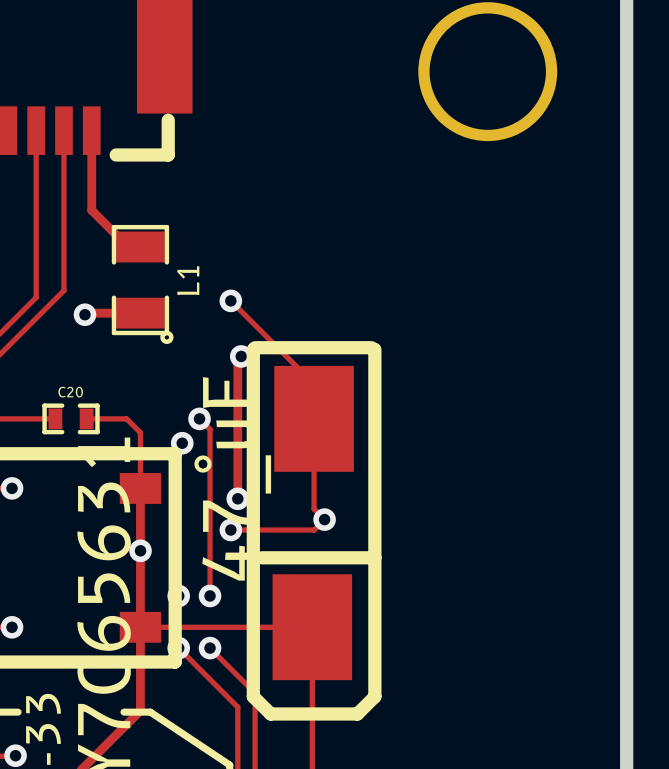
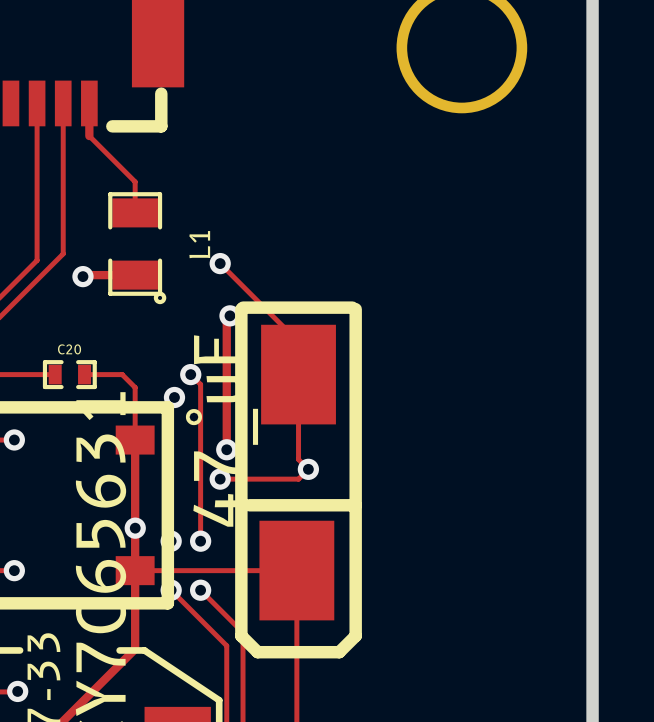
track: (91, 165) (91, 210) (128, 246) (140, 246) -> (89, 136) (135, 181) (135, 212)
L1 name position: L1 (188, 280) -> L1 (199, 244)
via position: (140, 550) -> (135, 528)

